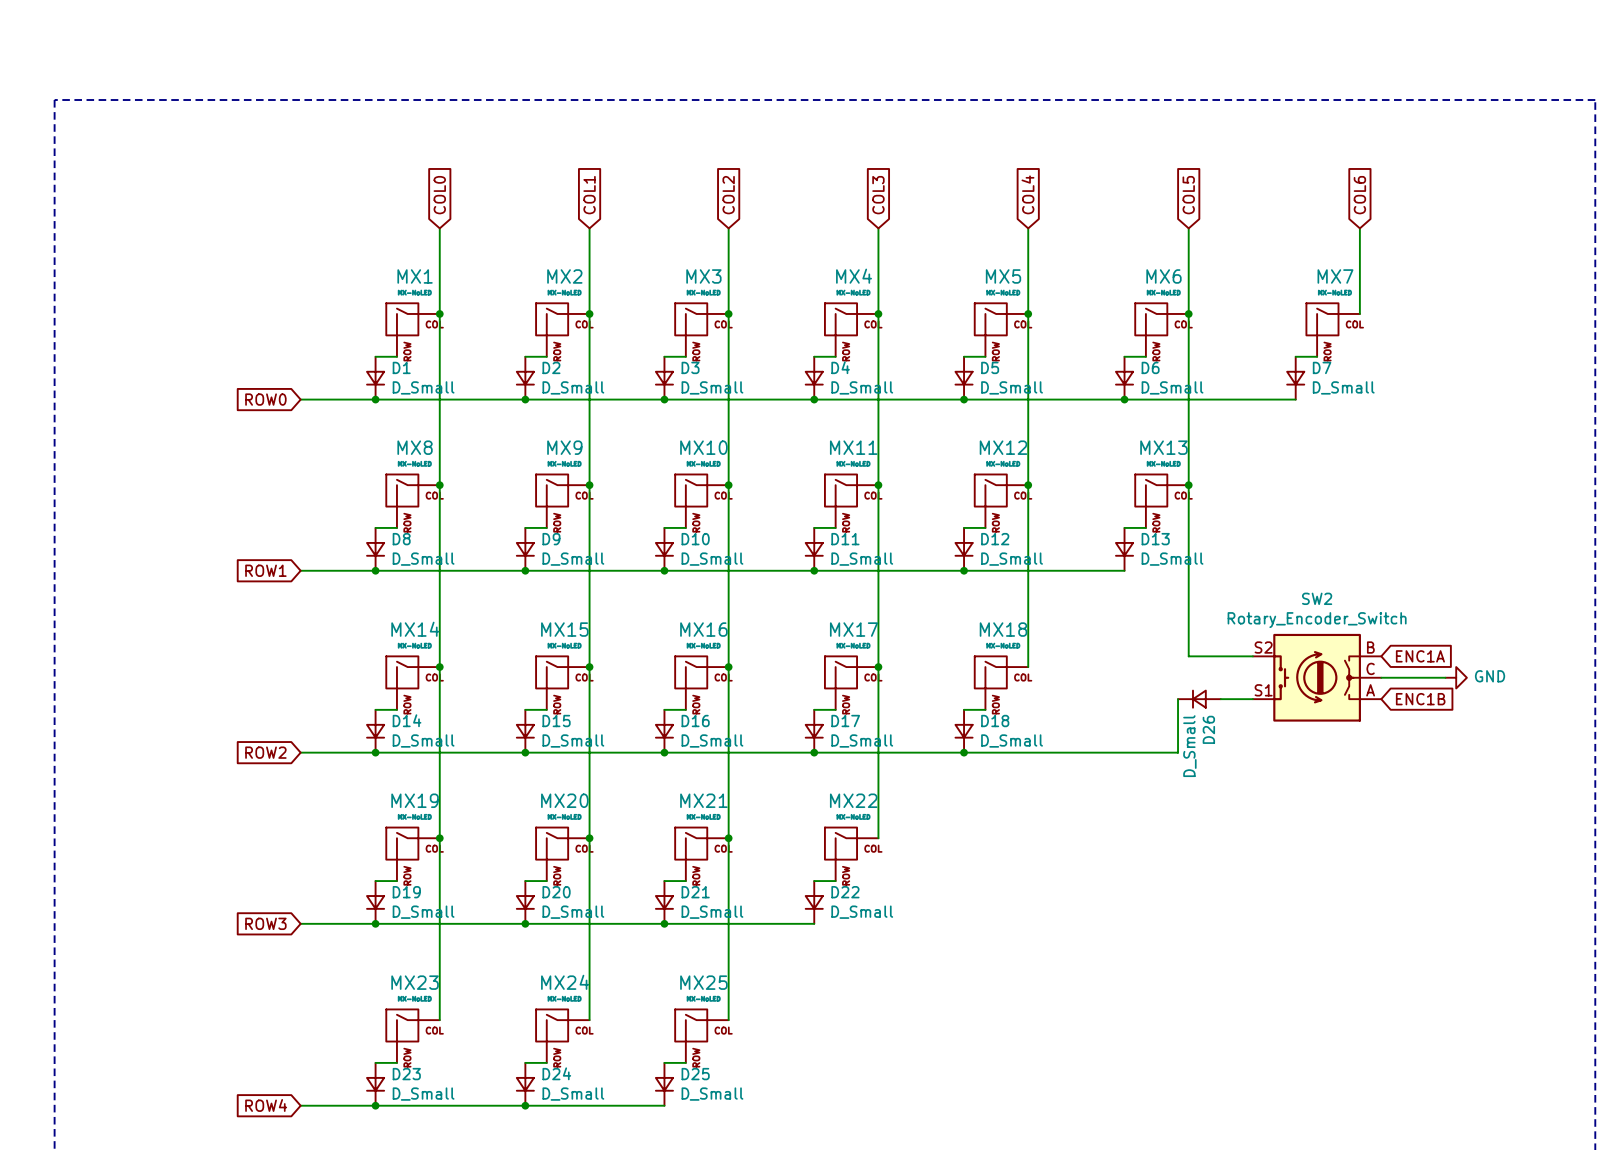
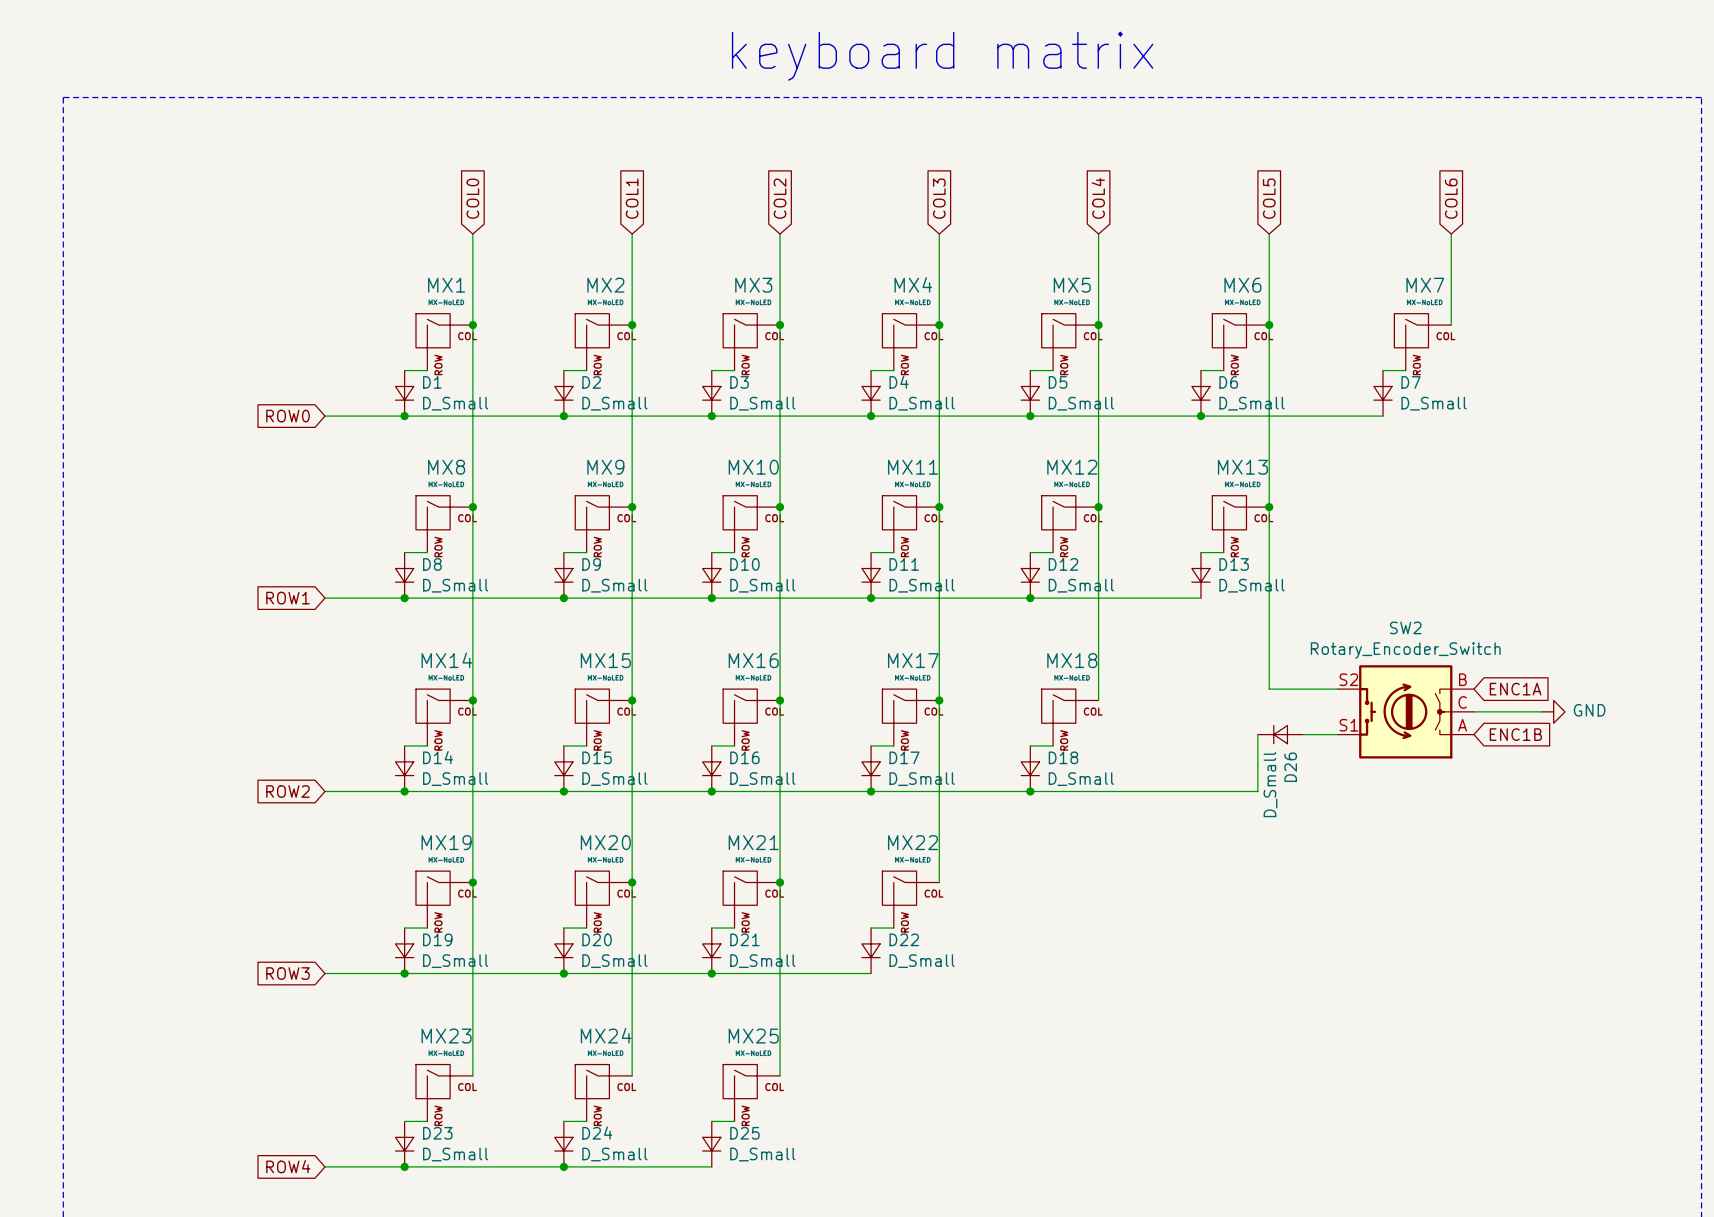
text: none -> keyboard matrix (942, 56)

